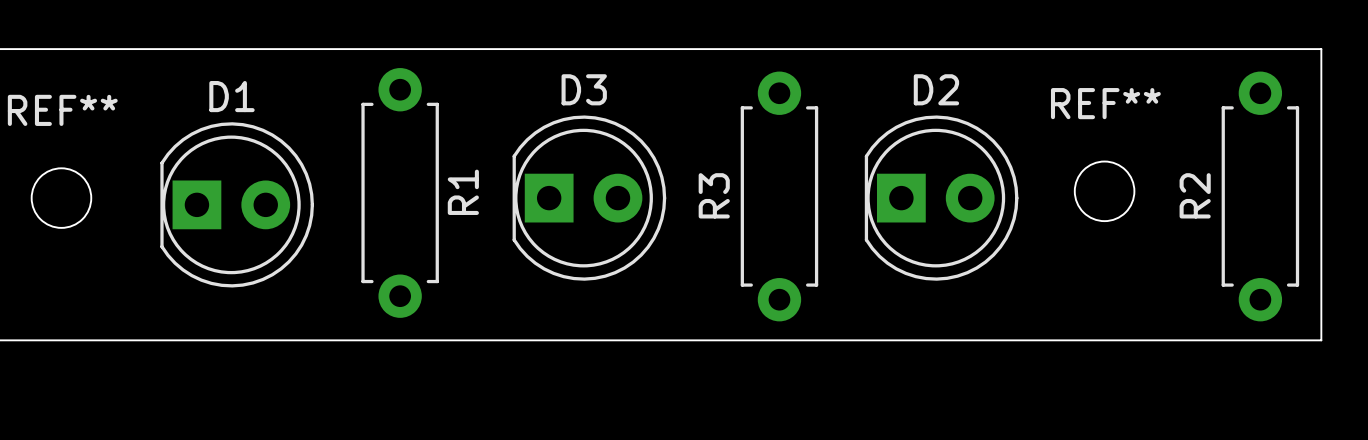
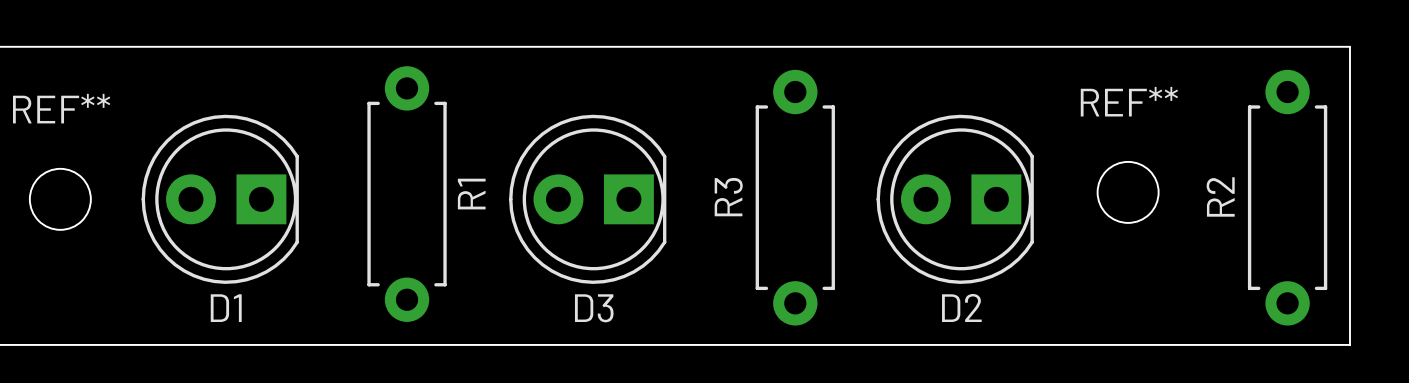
D3 rotation: 0° (589, 198) -> 180° (587, 199)
D2 rotation: 0° (941, 198) -> 180° (955, 199)
D1 rotation: 0° (237, 204) -> 180° (220, 199)

